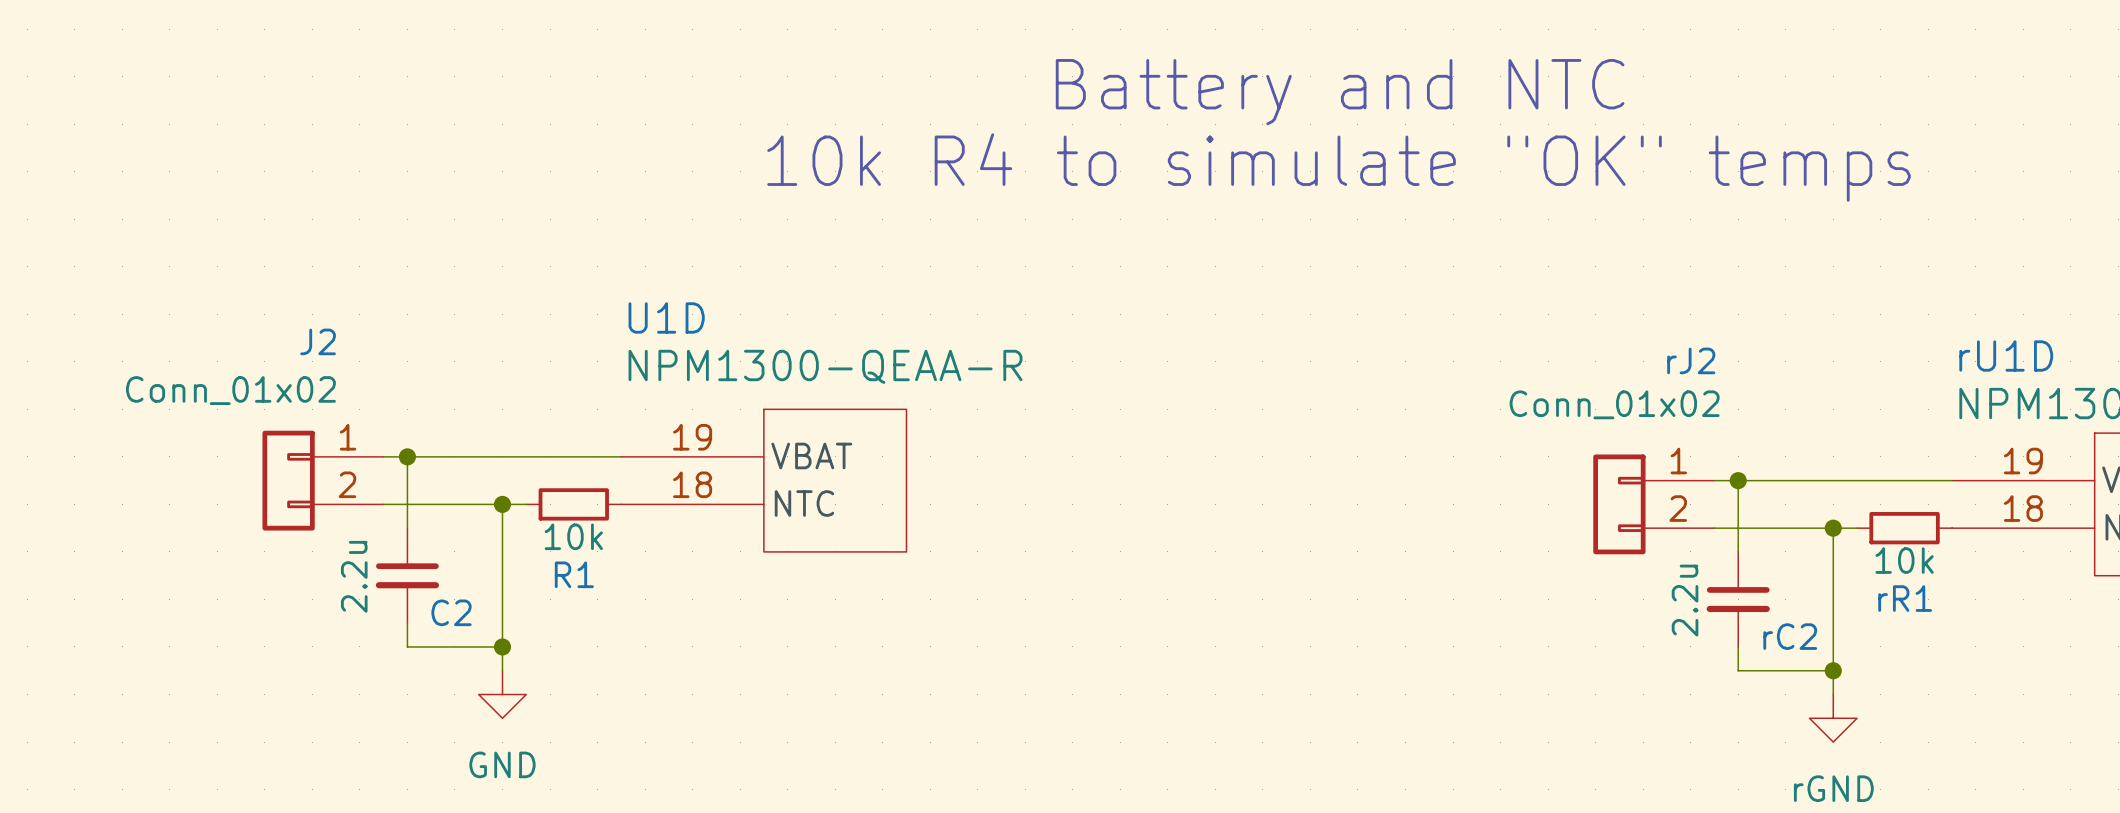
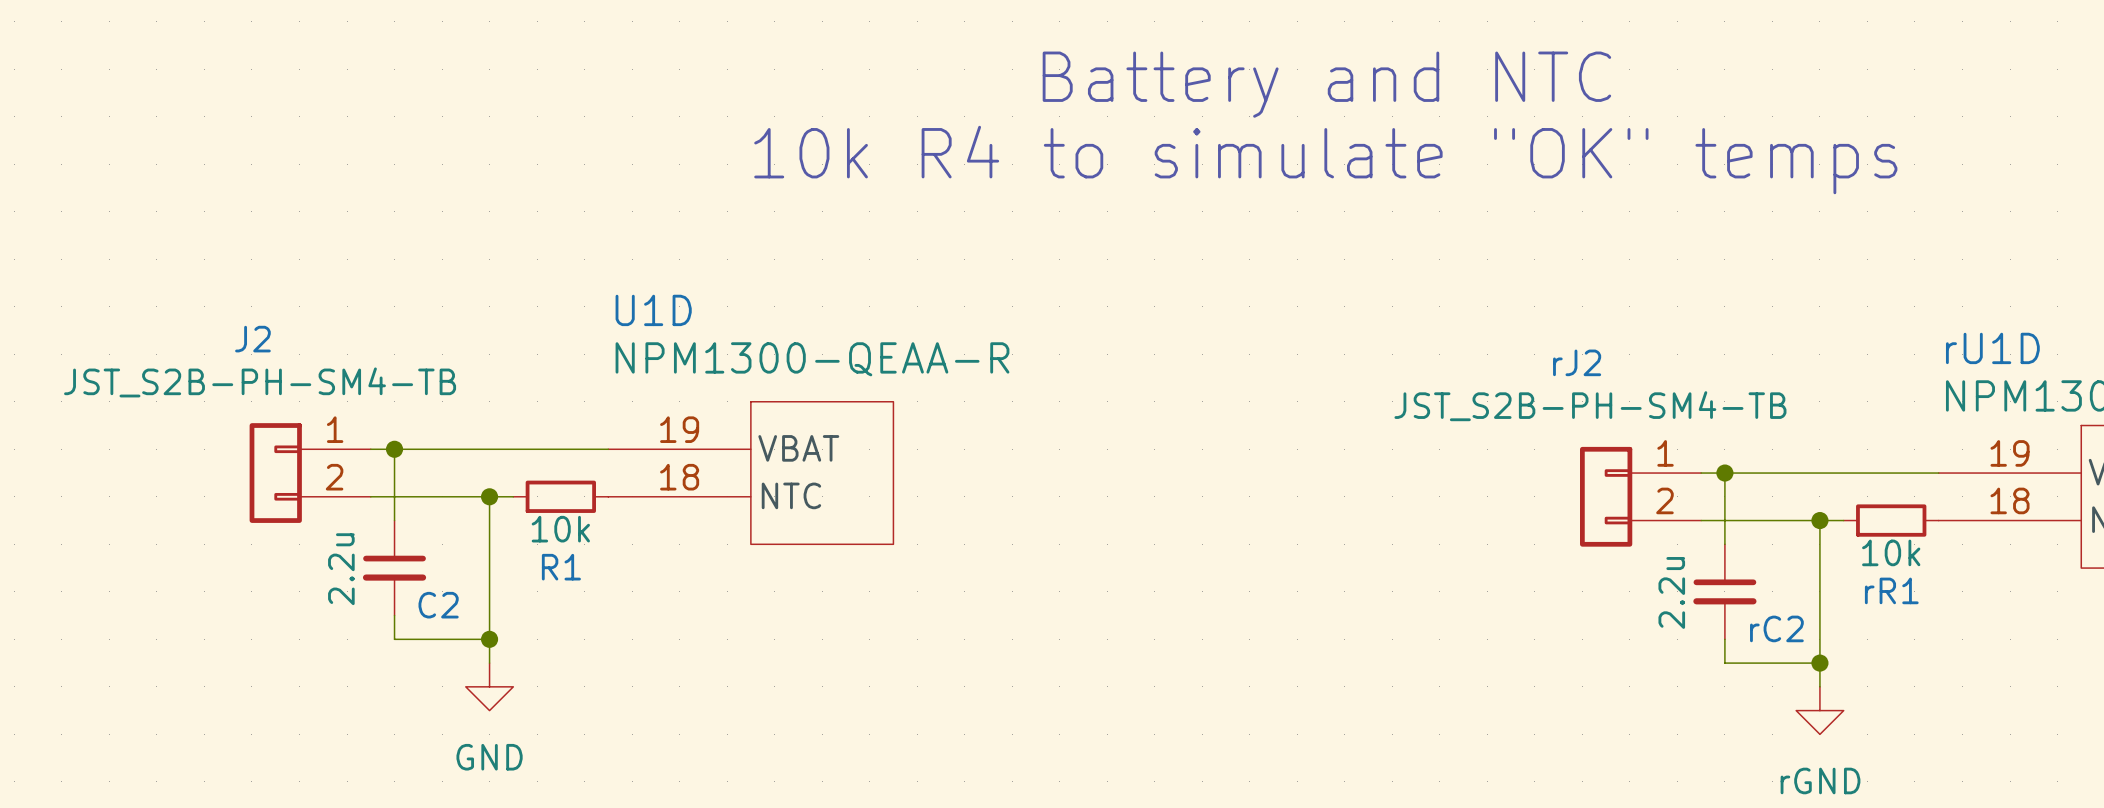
J2 name position: J2 (318, 341) -> J2 (252, 339)
rJ2 name position: rJ2 (1691, 360) -> rJ2 (1577, 362)
J2 value: Conn_01x02 (230, 390) -> JST_S2B-PH-SM4-TB (260, 382)
rJ2 value: Conn_01x02 (1614, 404) -> JST_S2B-PH-SM4-TB (1590, 406)

